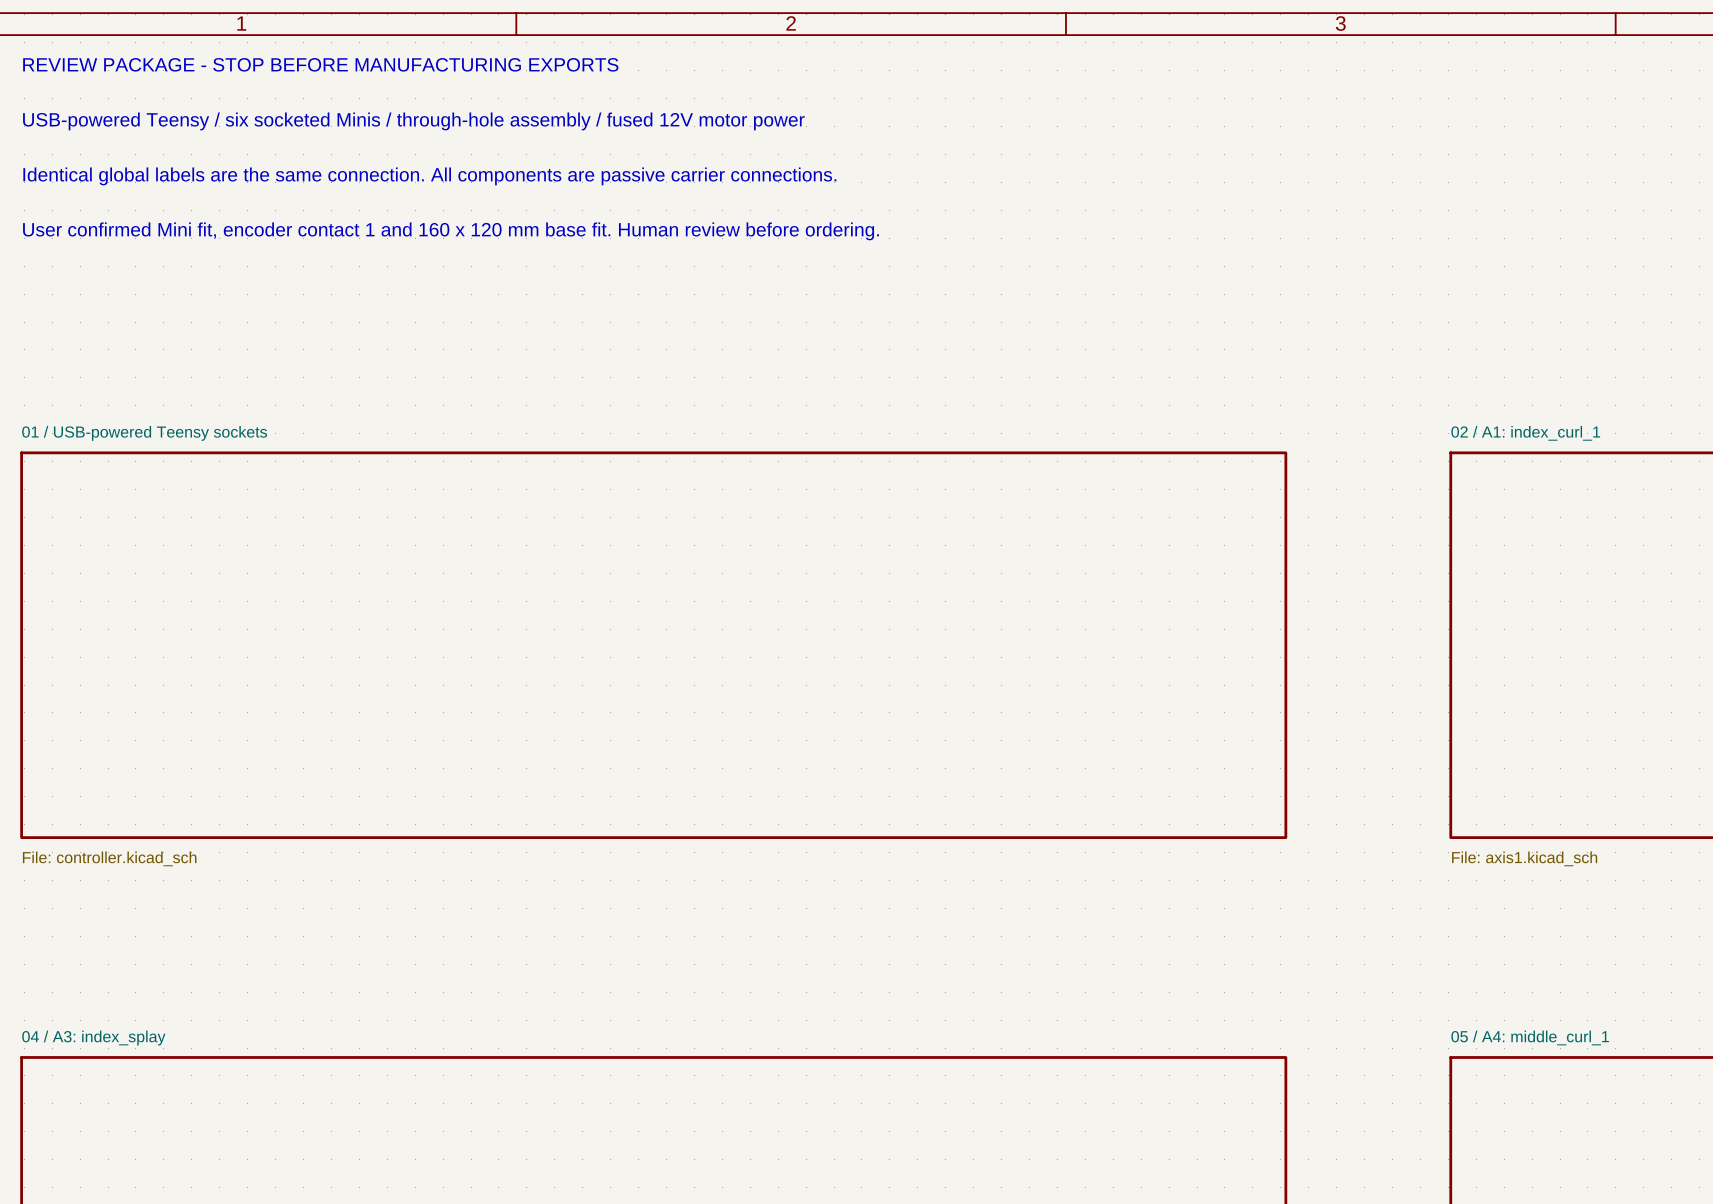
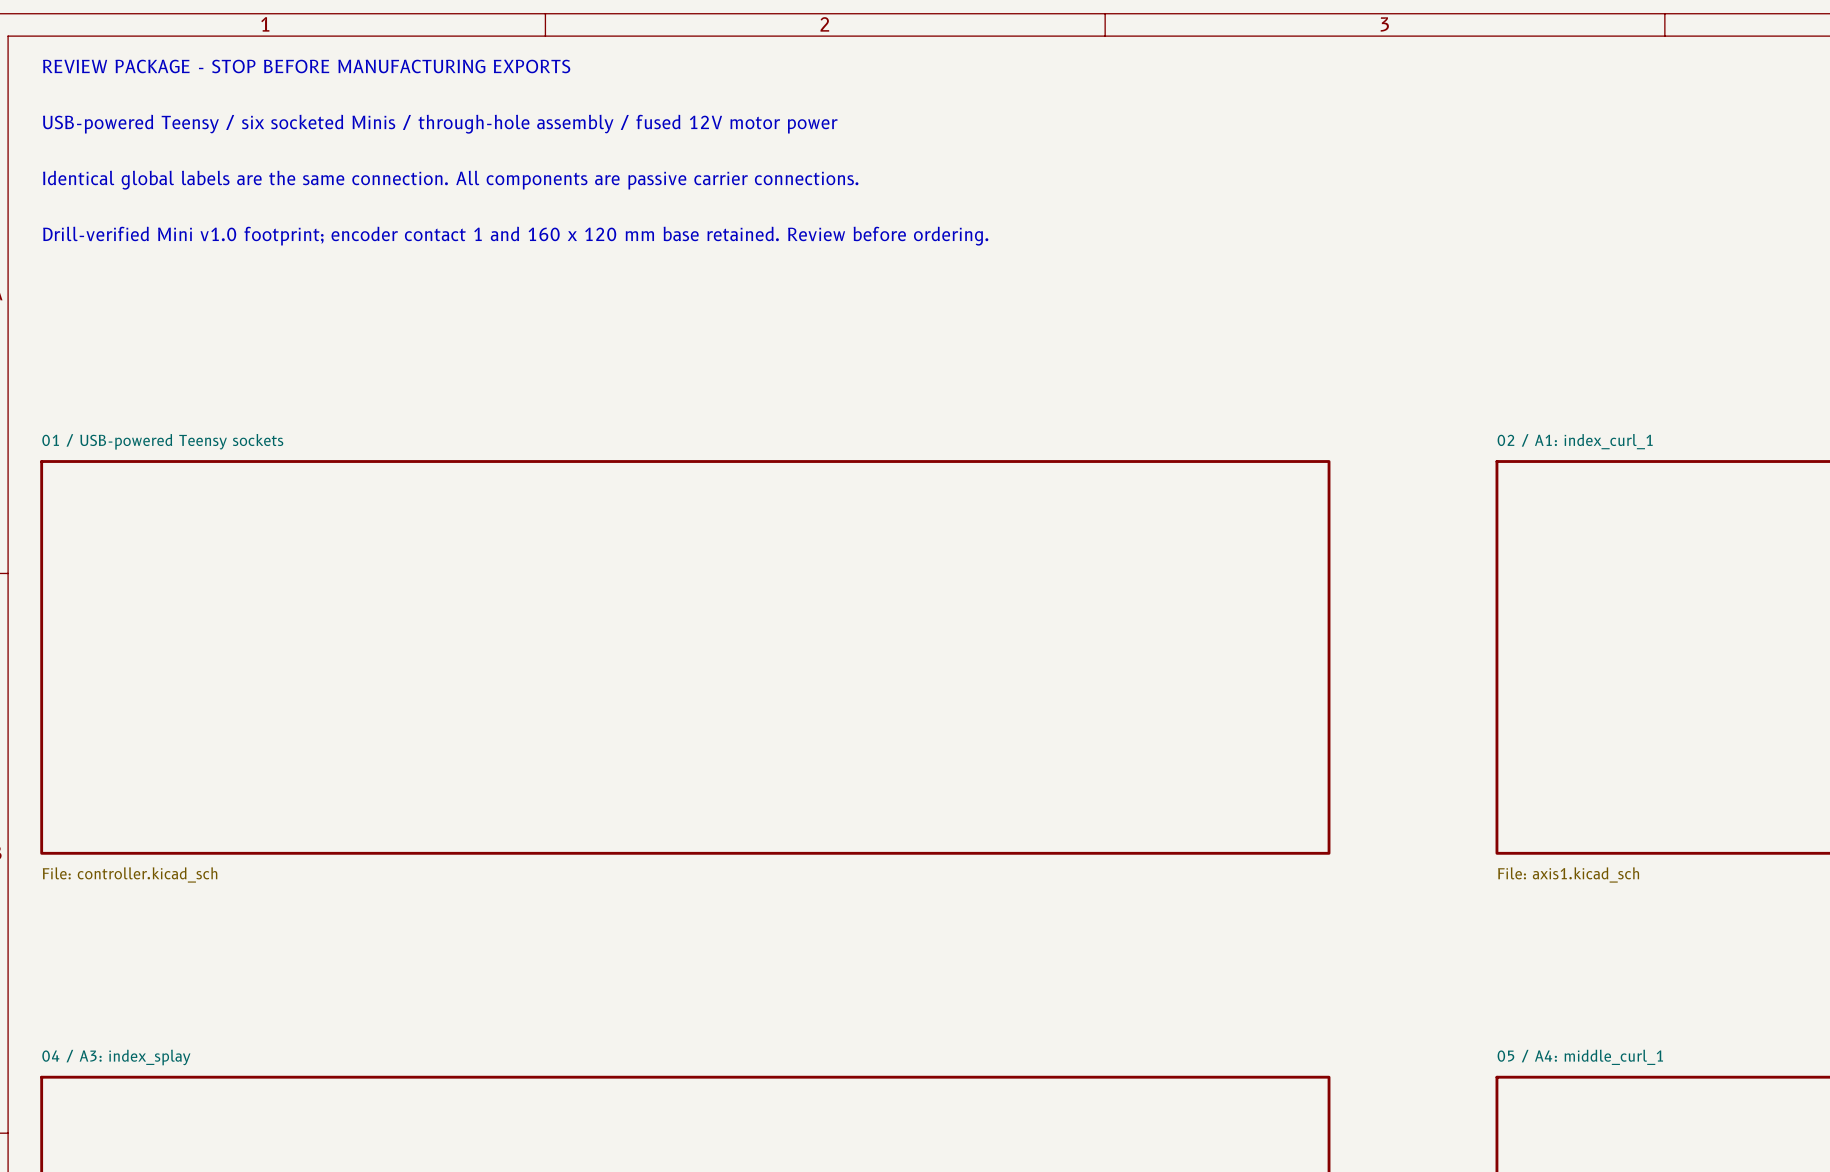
text: User confirmed Mini fit, encoder contact 1 and 160 x 120 mm base fit. Human review before ordering. (450, 231) -> Drill-verified Mini v1.0 footprint; encoder contact 1 and 160 x 120 mm base retained. Review before ordering. (515, 236)

